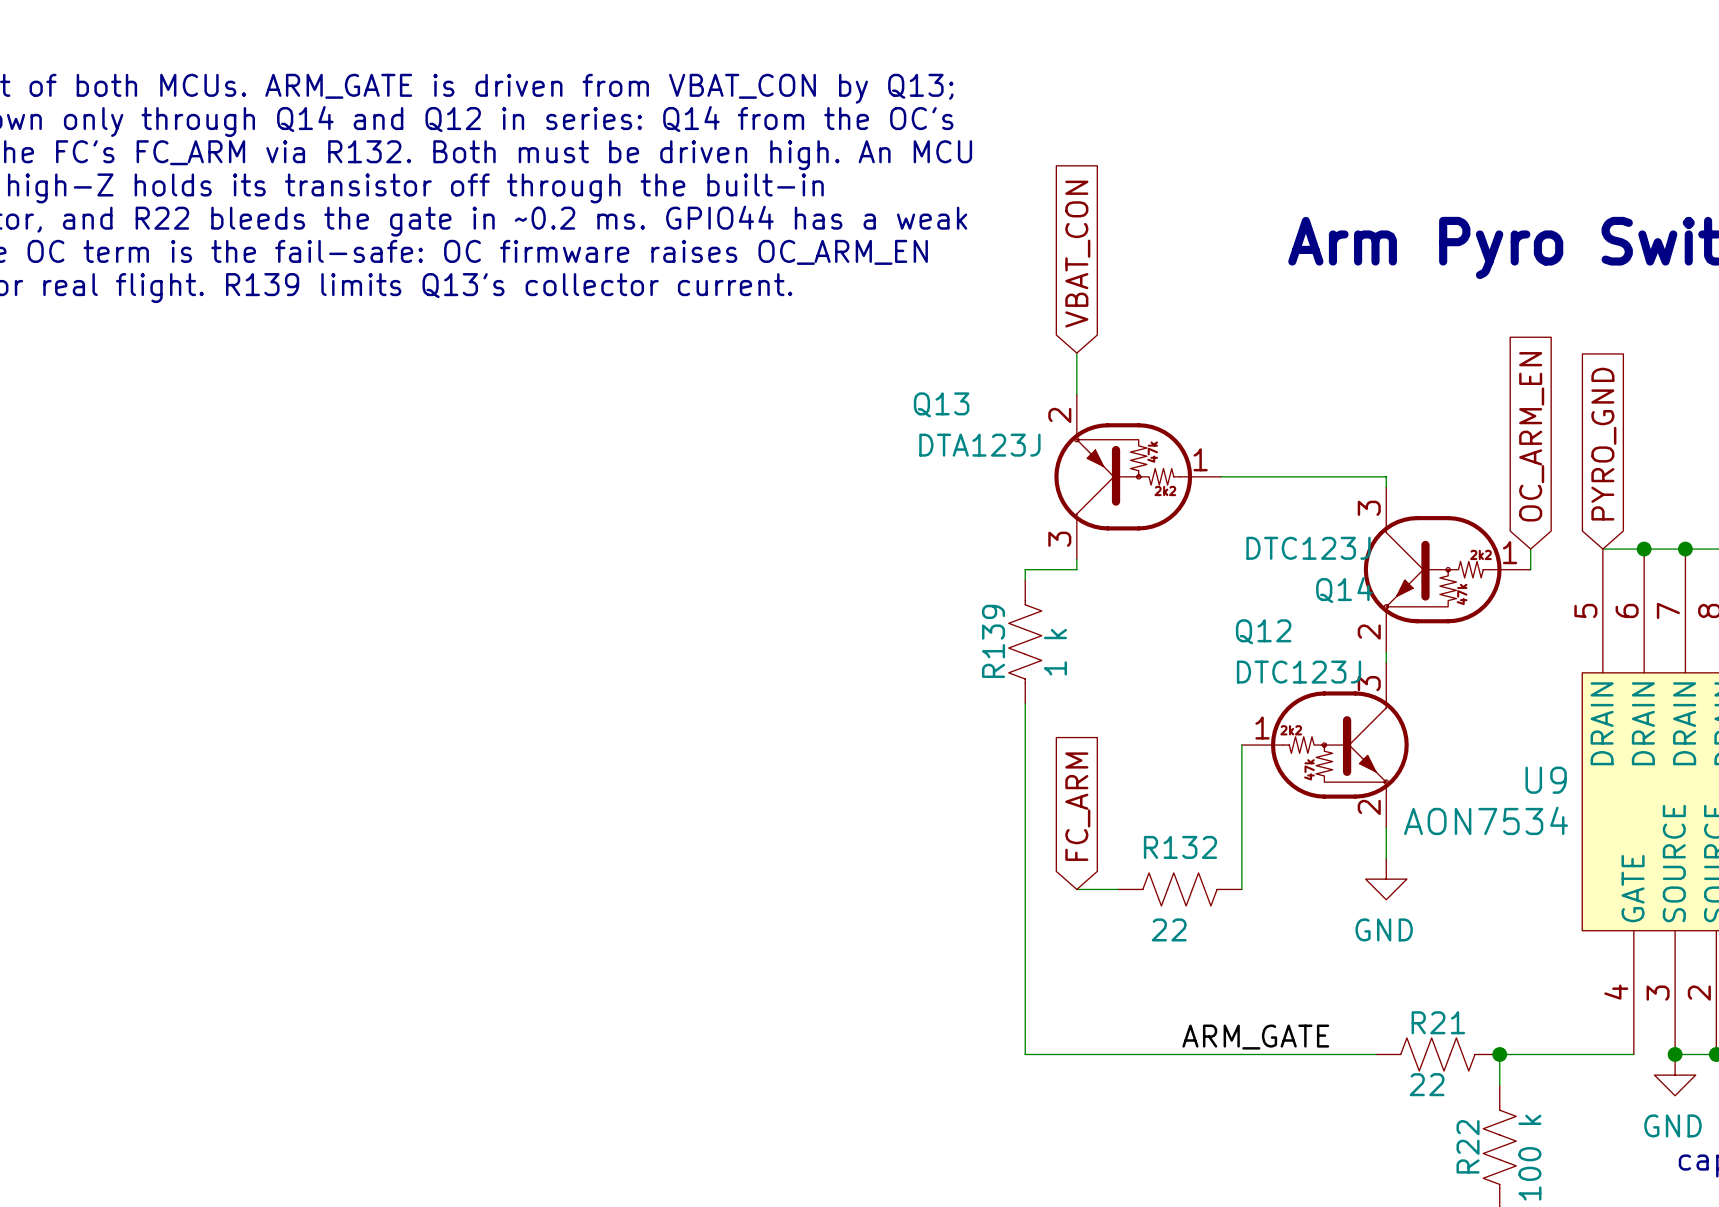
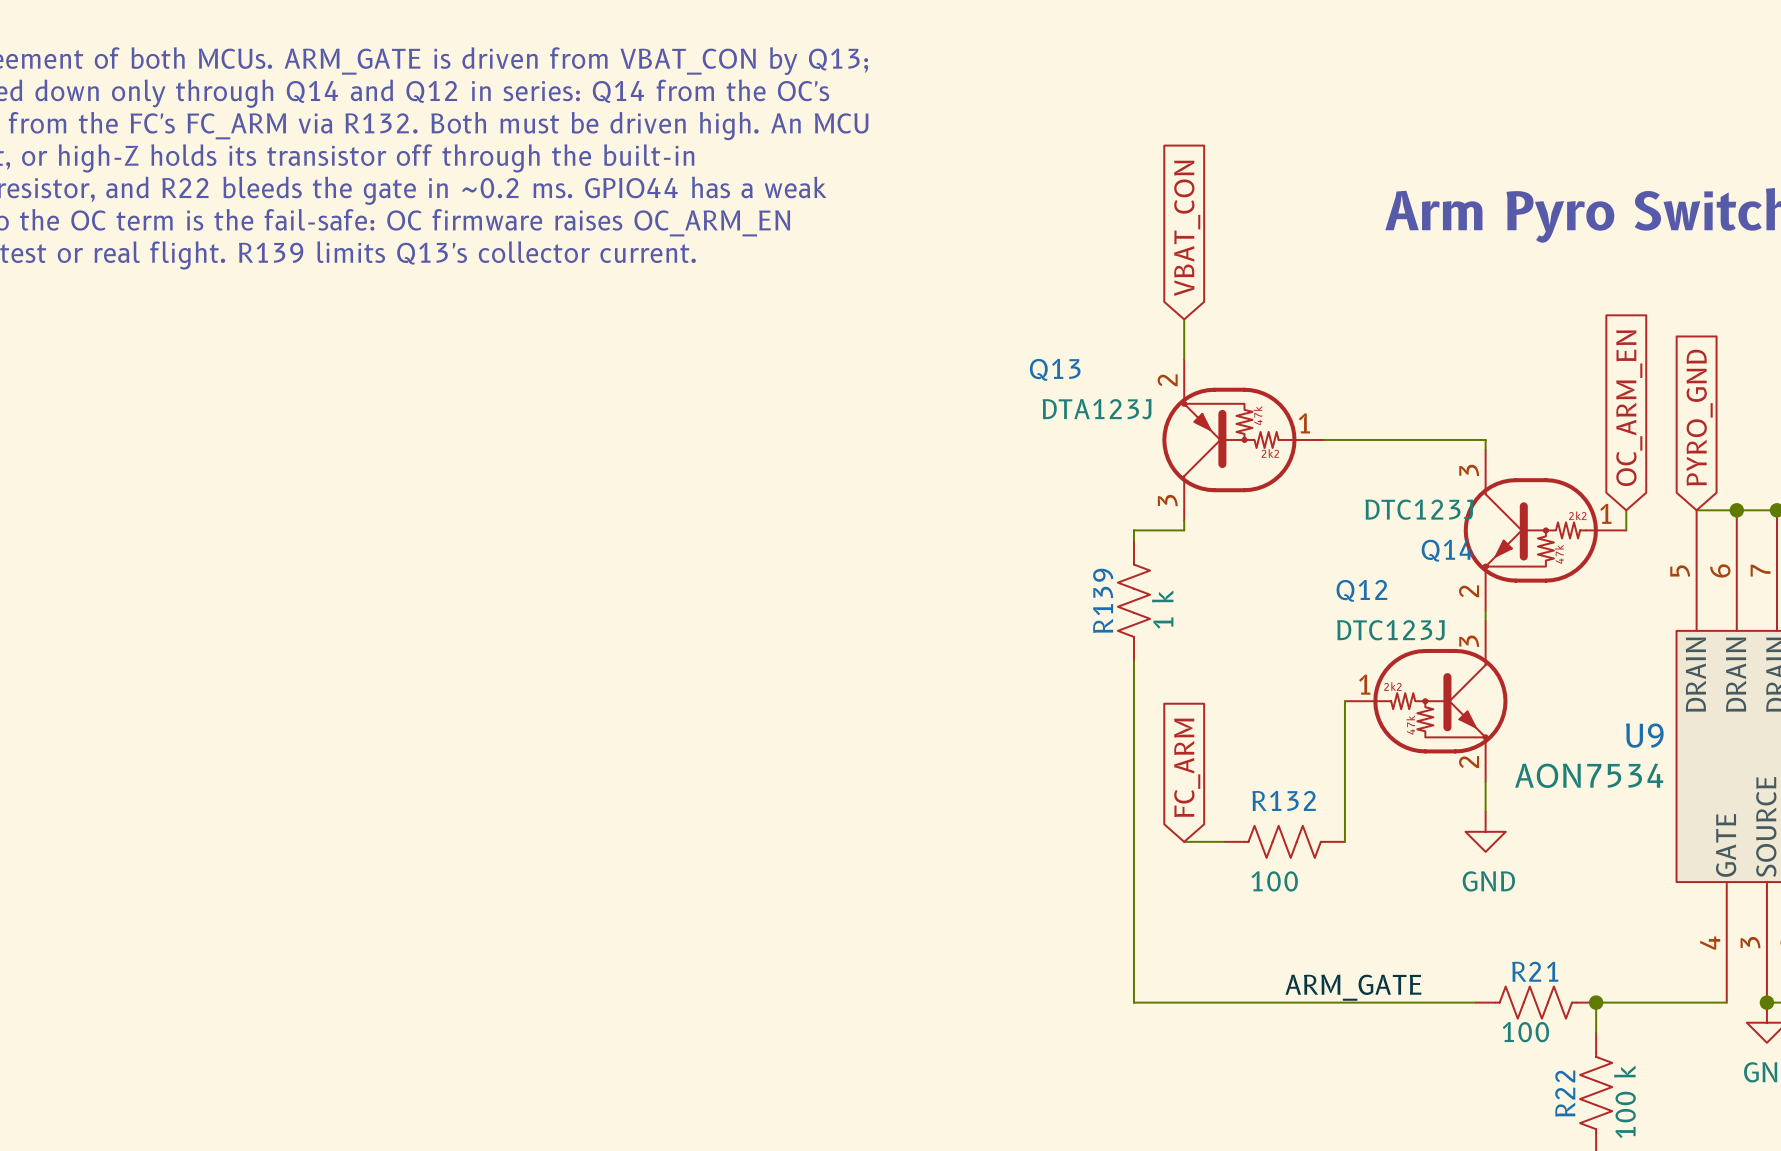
R132 value: 22 (1169, 929) -> 100 (1274, 881)
R21 value: 22 (1427, 1084) -> 100 (1525, 1032)

